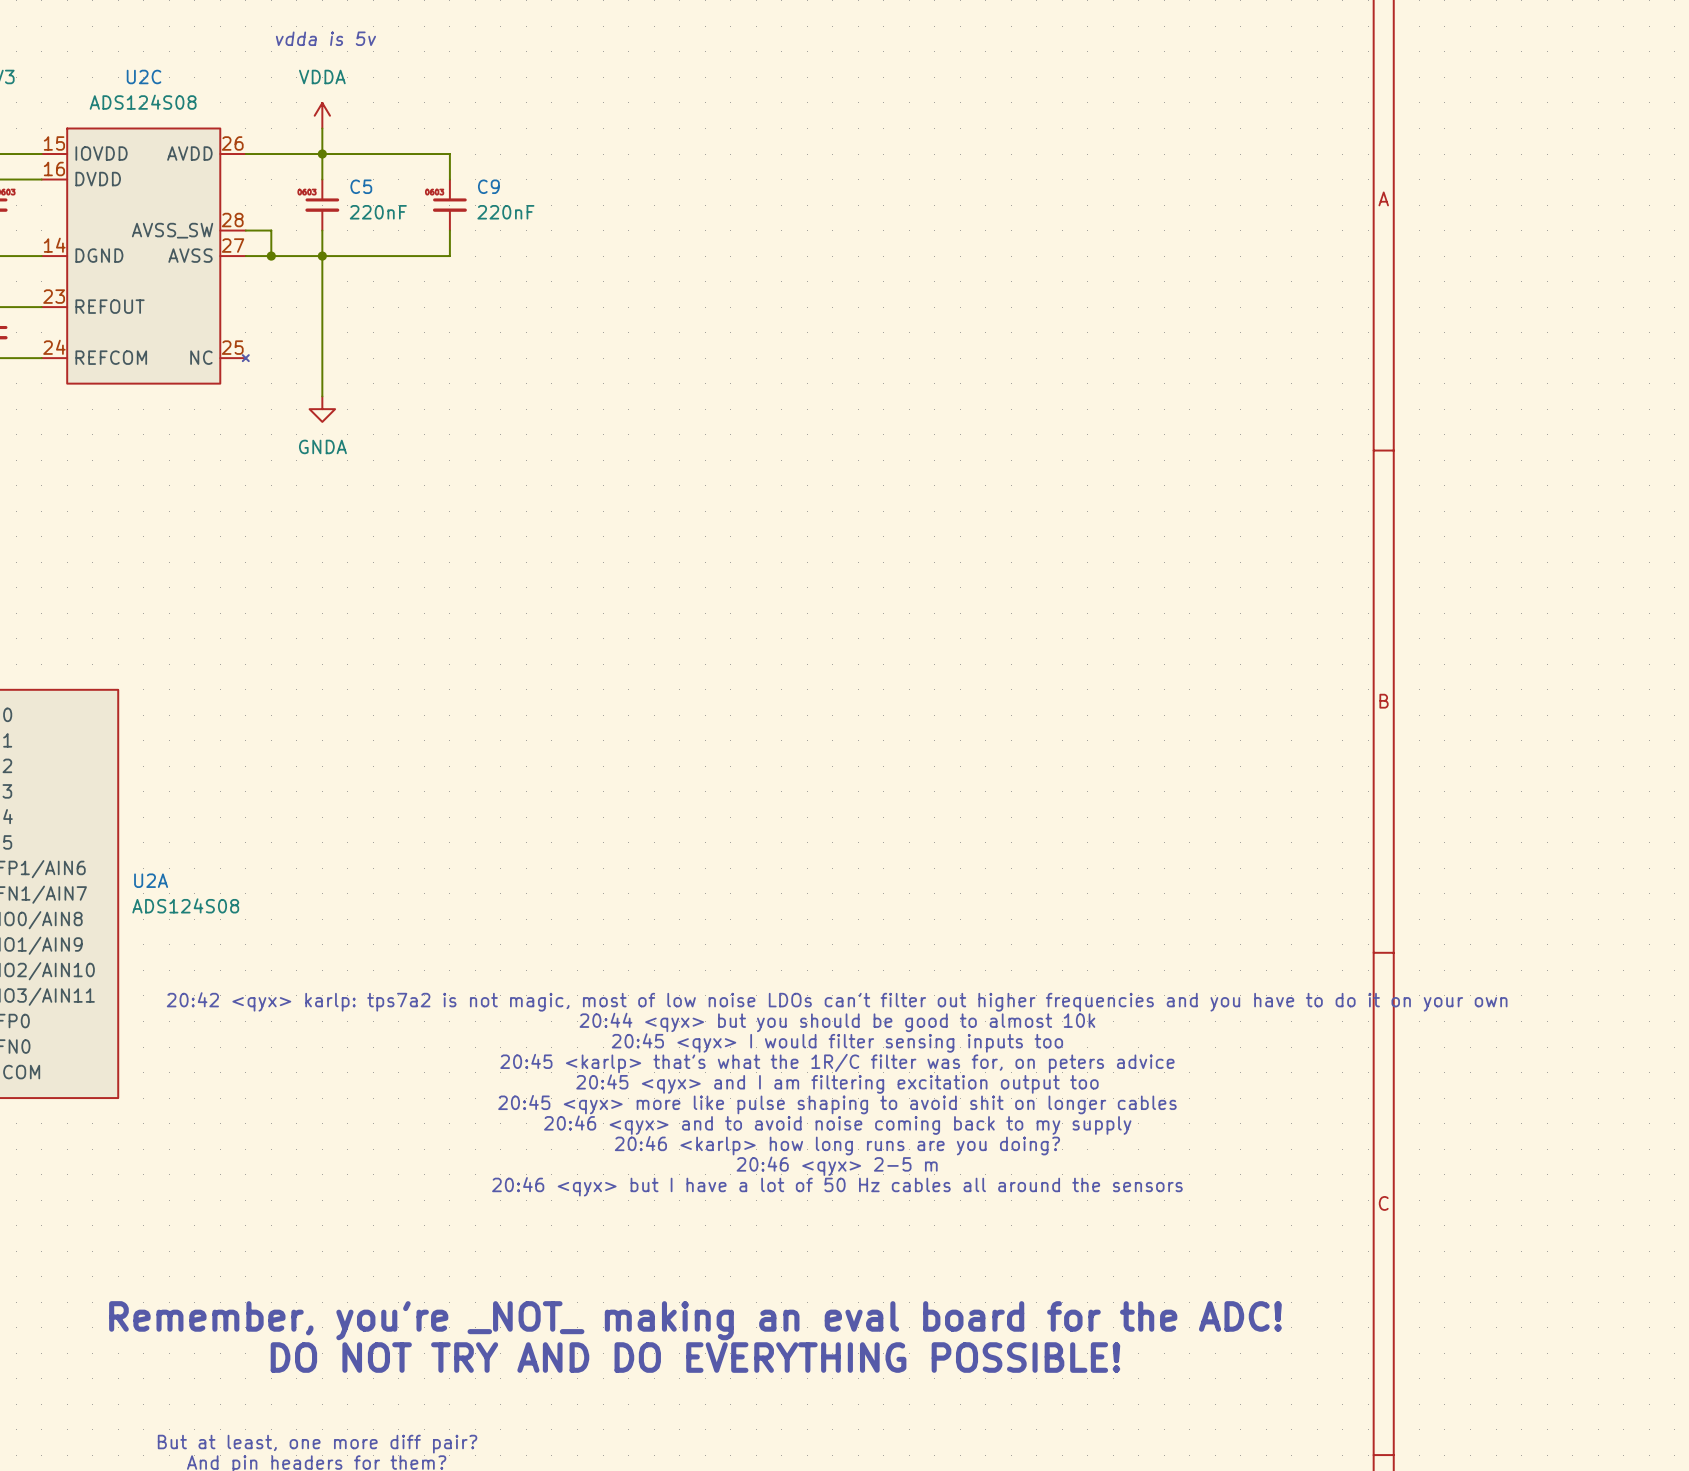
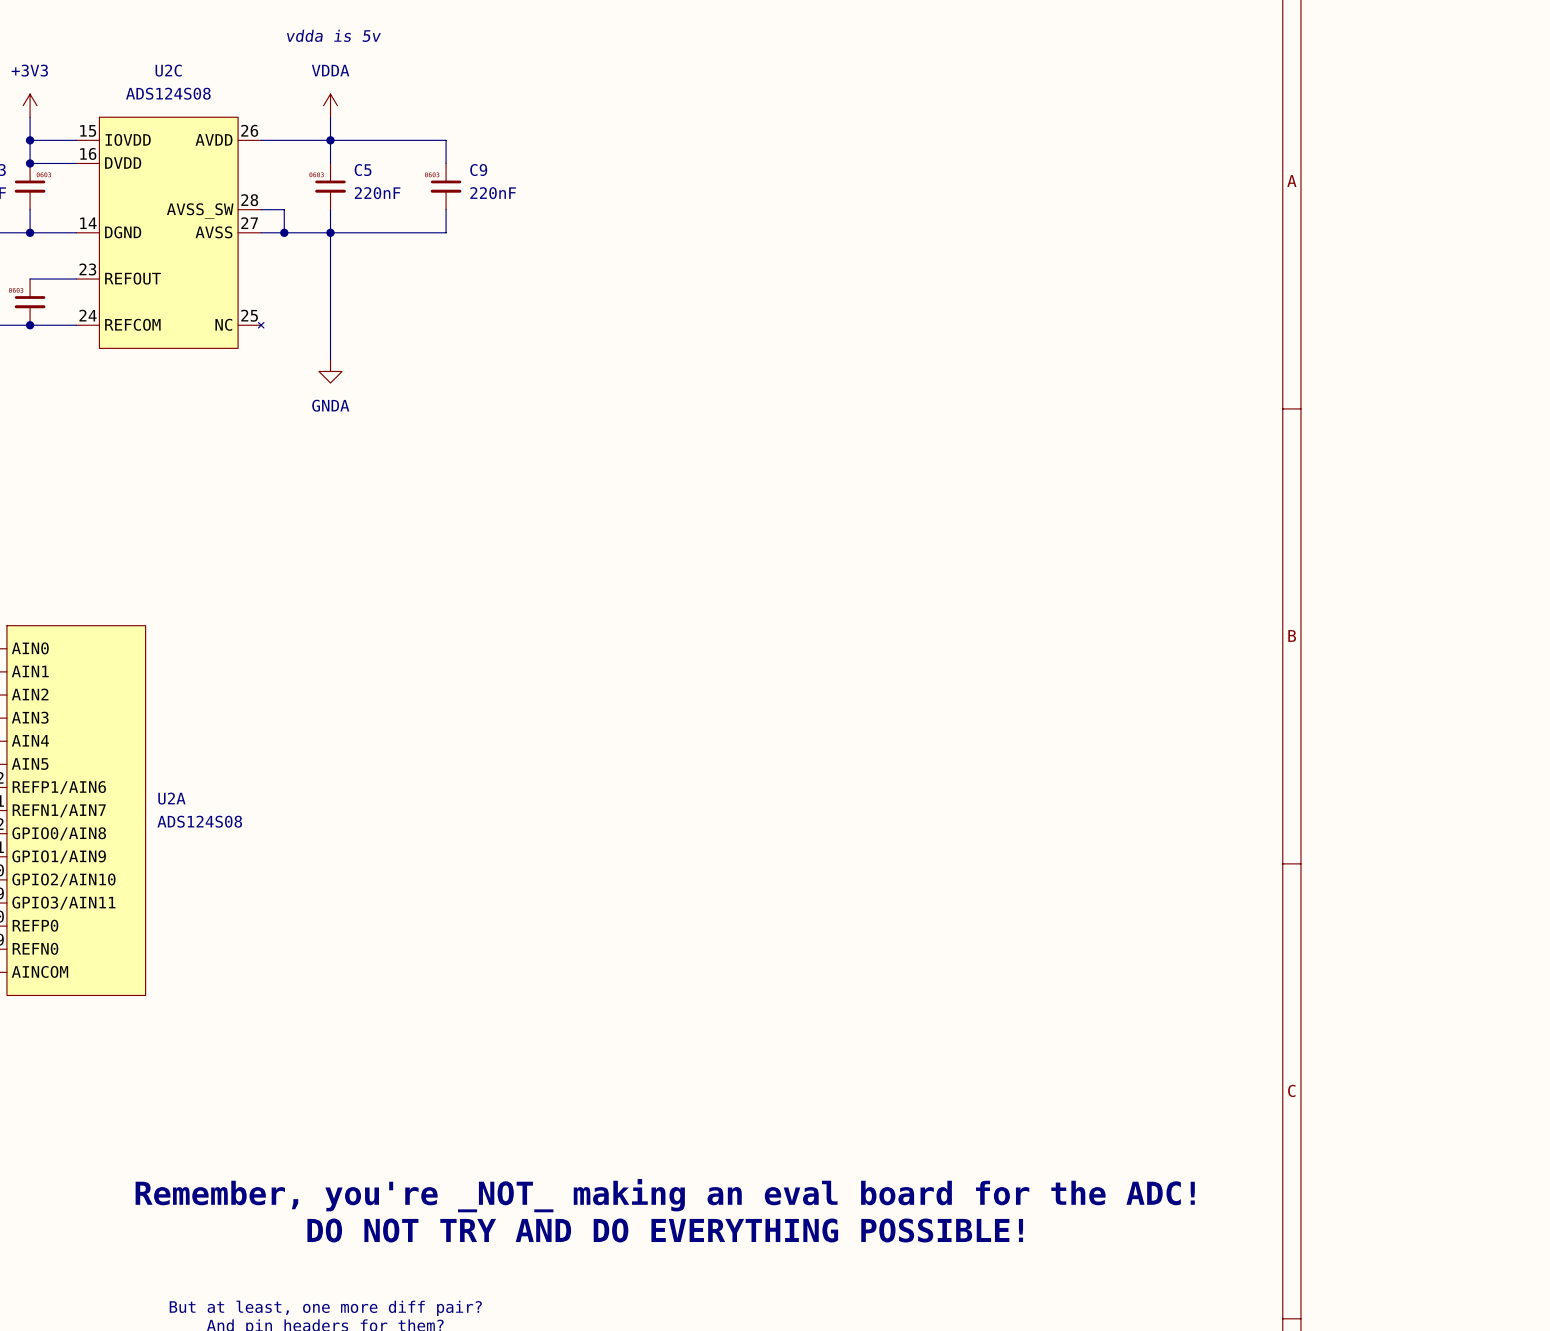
text: 20:42 <qyx> karlp: tps7a2 is not magic, most of low noise LDOs can't filter out higher frequencies and you have to do it on your own (837, 1001) -> none
text: 20:44 <qyx> but you should be good to almost 10k (837, 1022) -> none
text: 20:45 <qyx> I would filter sensing inputs too (837, 1042) -> none
text: 20:45 <karlp> that's what the 1R/C filter was for, on peters advice (837, 1063) -> none
text: 20:45 <qyx> and I am filtering excitation output too (837, 1084) -> none
text: 20:45 <qyx> more like pulse shaping to avoid shit on longer cables (837, 1104) -> none
text: 20:46 <qyx> and to avoid noise coming back to my supply (837, 1125) -> none
text: 20:46 <karlp> how long runs are you doing? (837, 1145) -> none
text: 20:46 <qyx> 2-5 m (837, 1166) -> none
text: 20:46 <qyx> but I have a lot of 50 Hz cables all around the sensors (837, 1186) -> none

